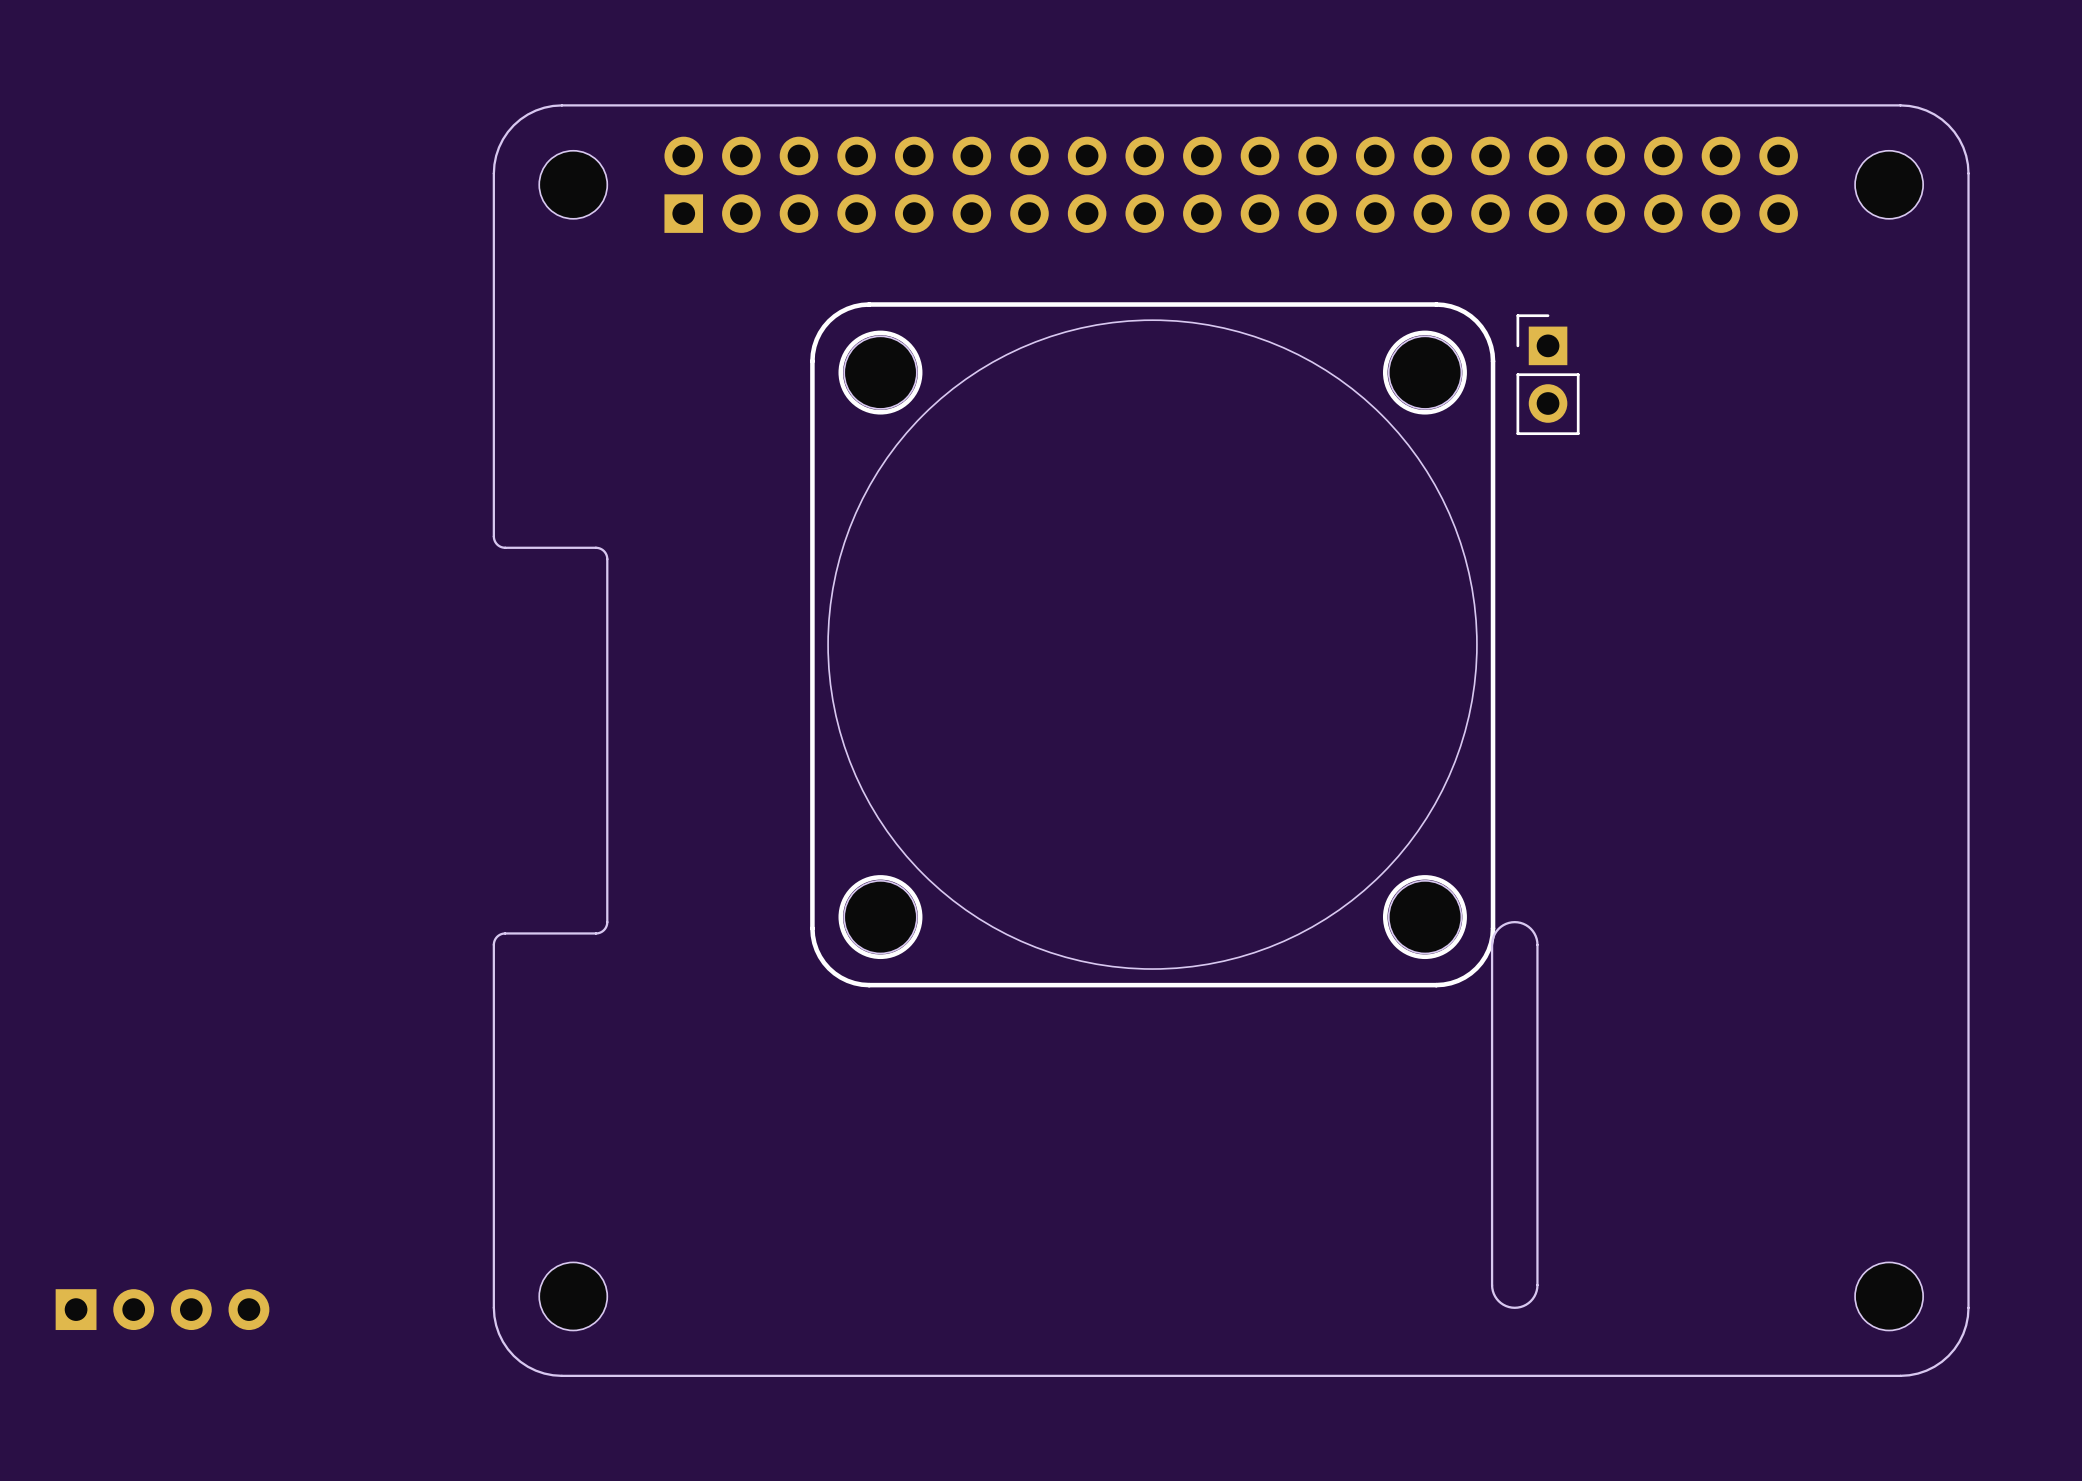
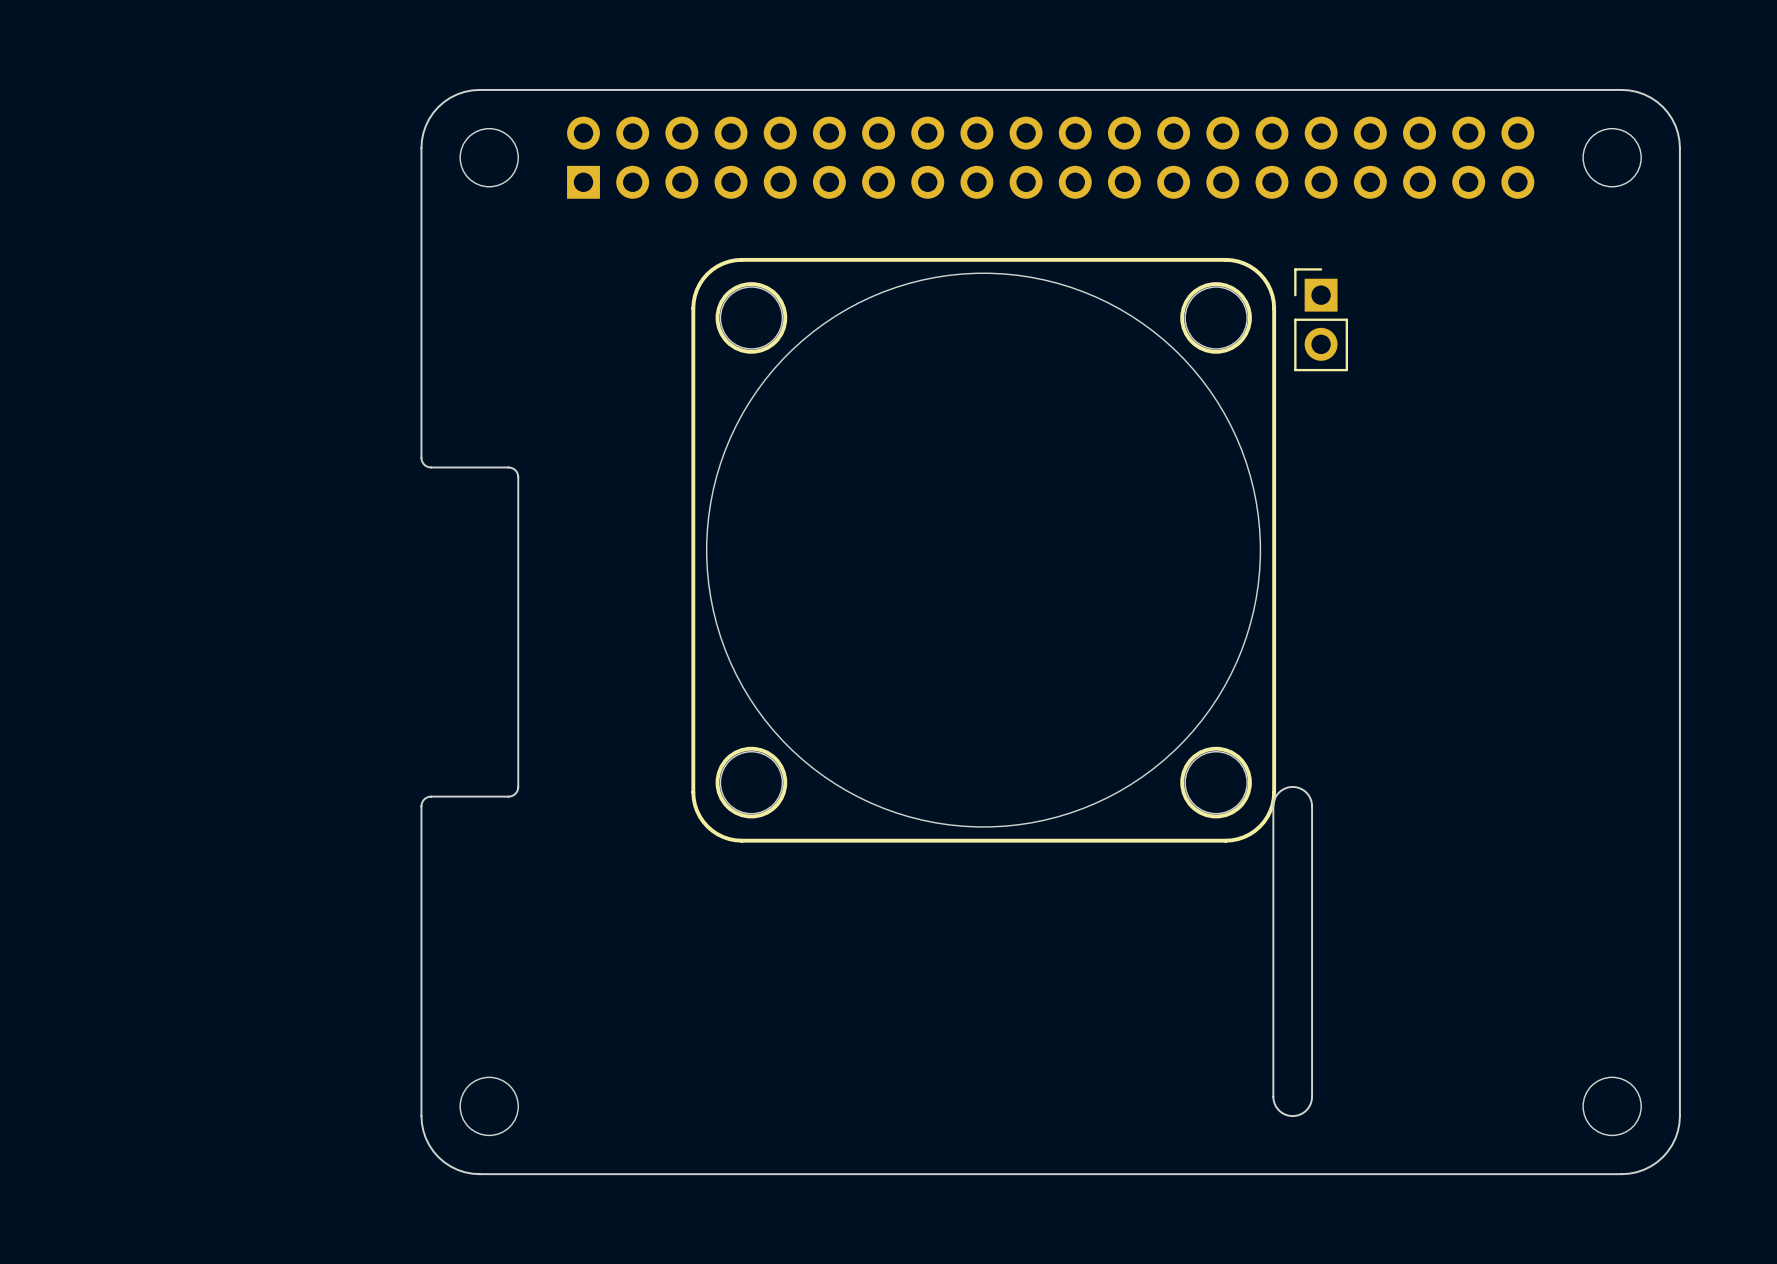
part: (162, 1309) -> none

